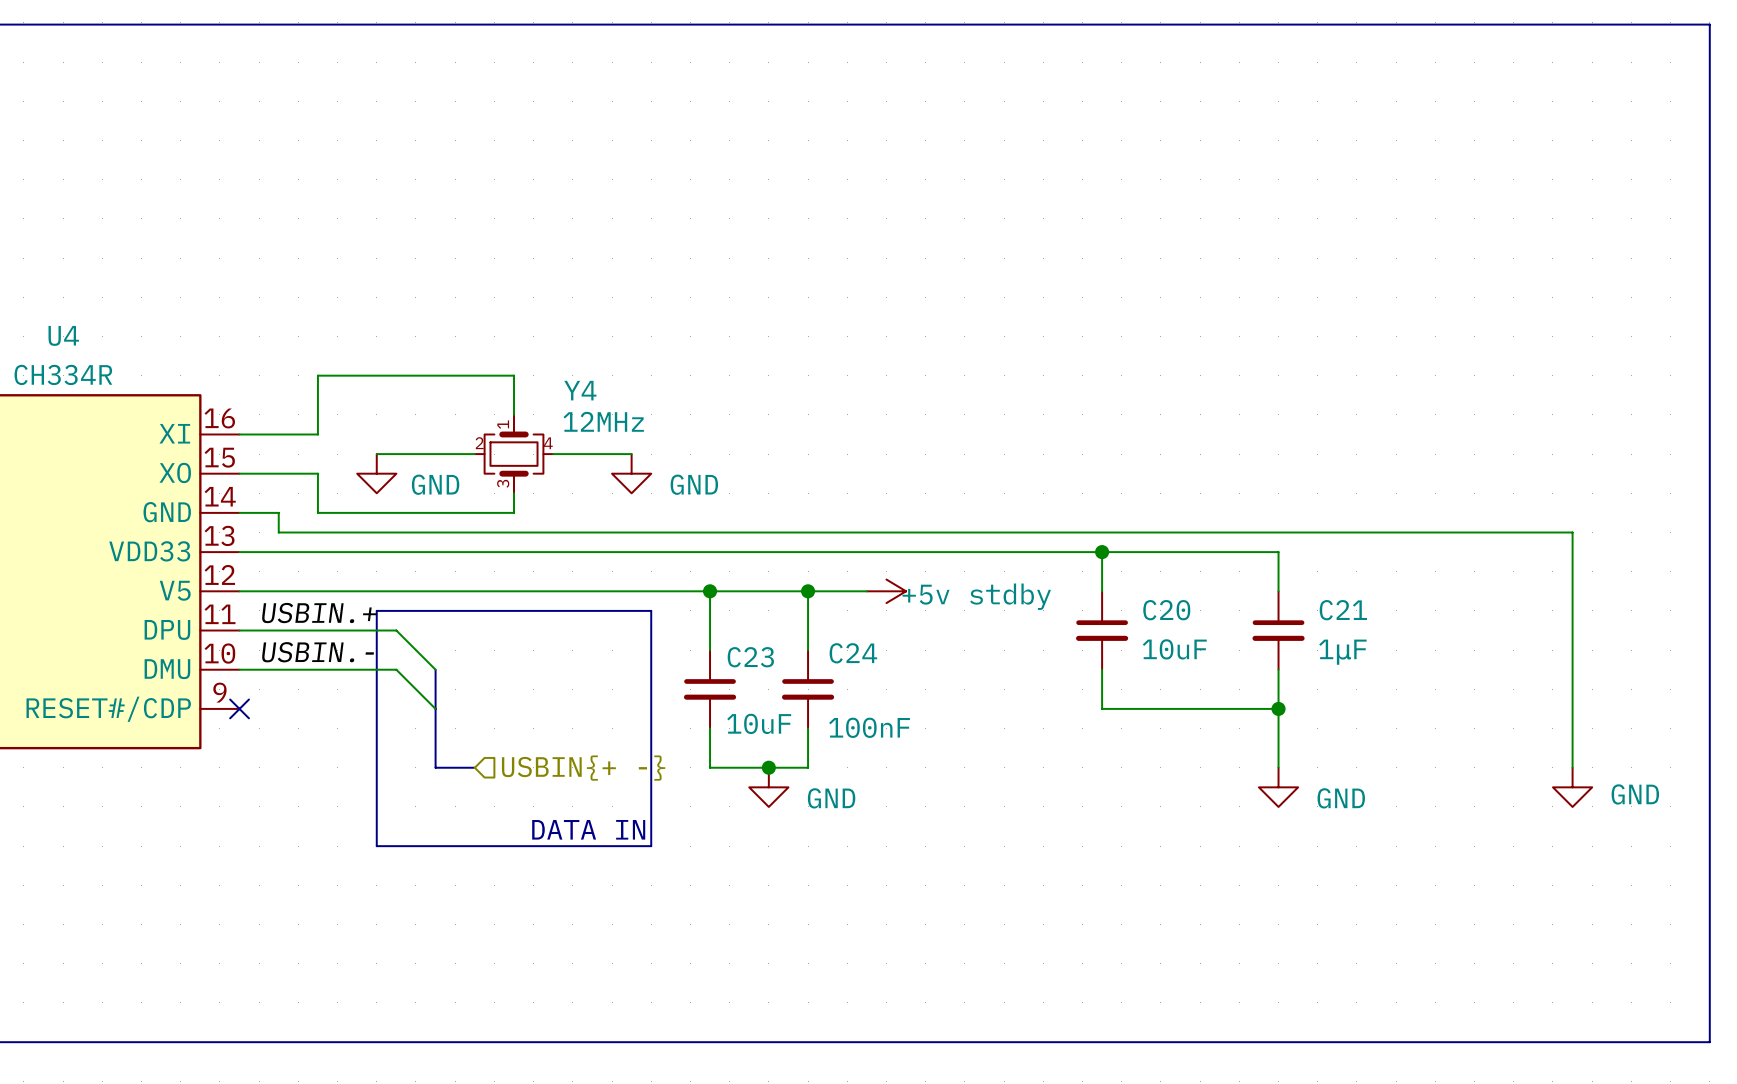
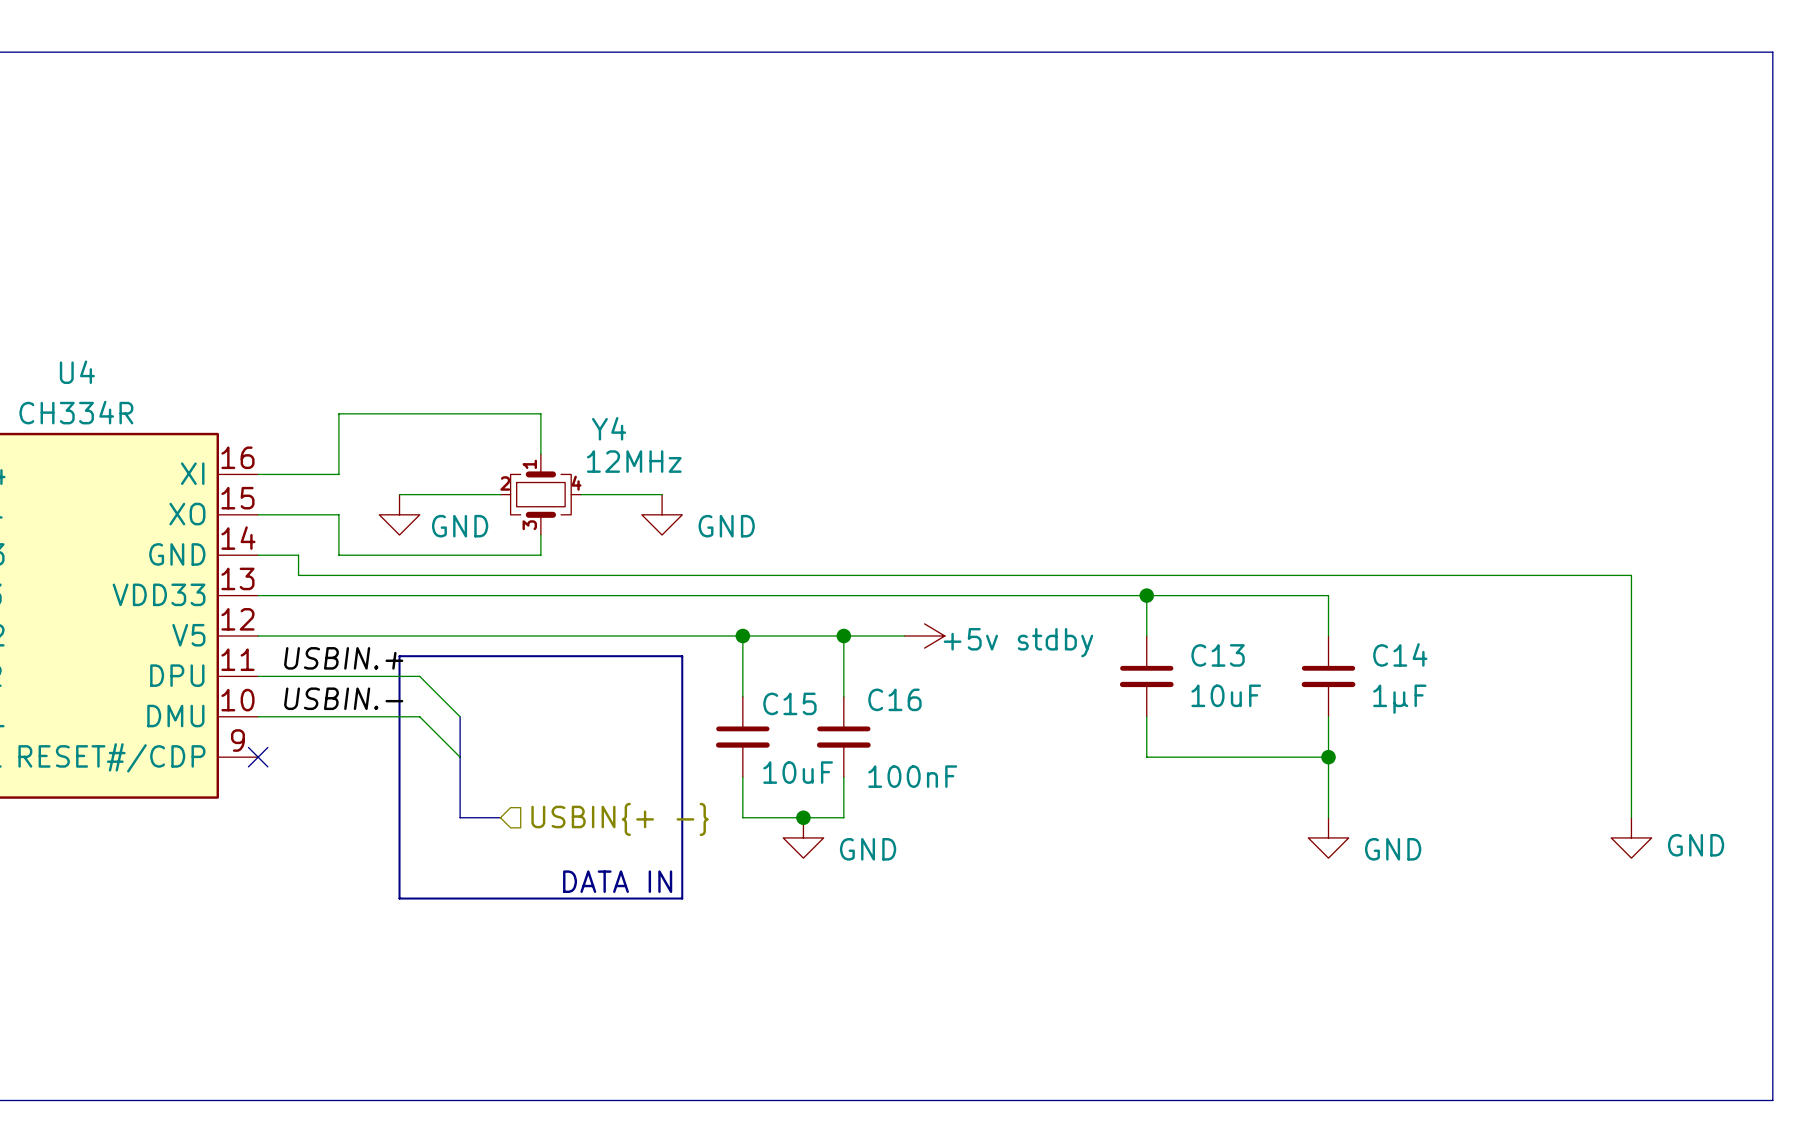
C20 name: C20 (1166, 610) -> C13 (1218, 655)
C21 name: C21 (1343, 610) -> C14 (1400, 654)
C24 name: C24 (853, 653) -> C16 (894, 699)
C23 name: C23 (750, 657) -> C15 (789, 703)

